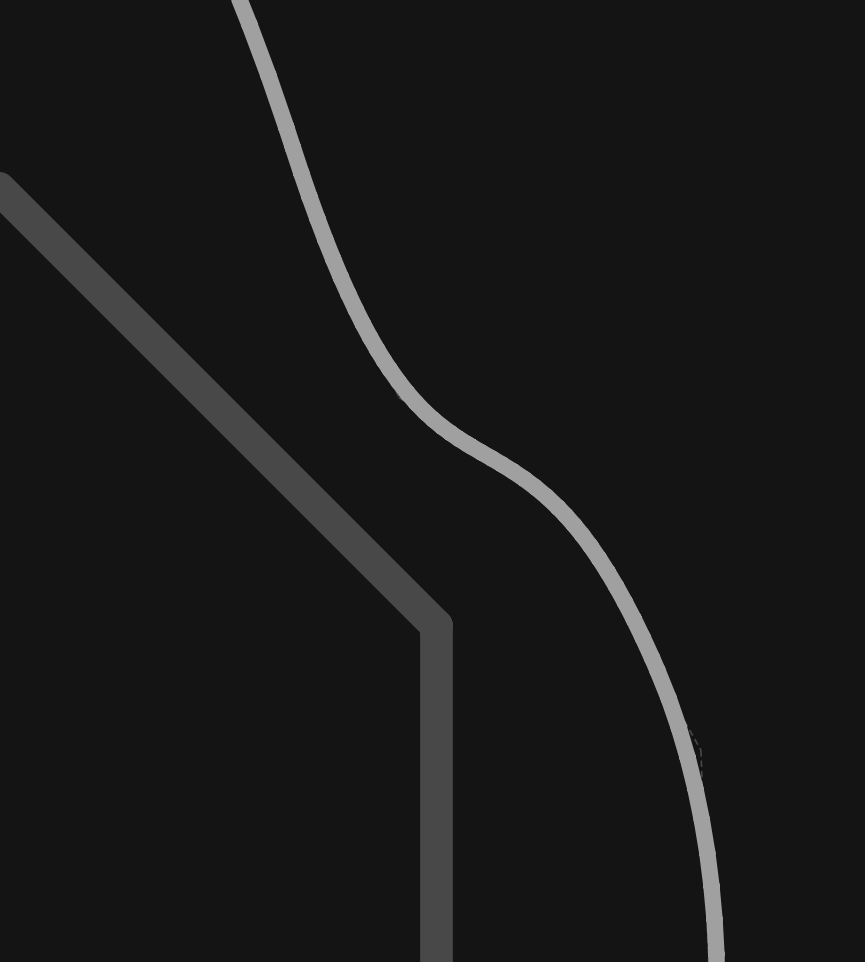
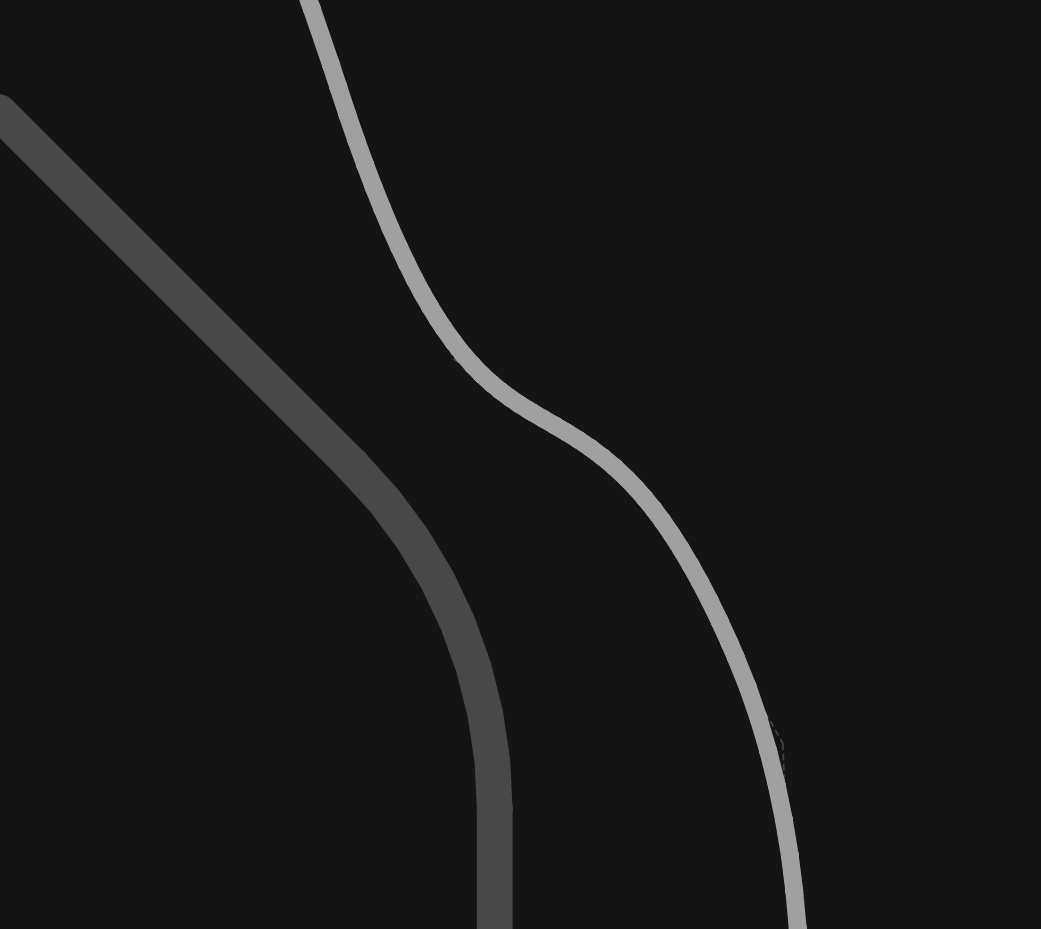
track: (305, 495) (436, 625) (436, 810) -> (352, 465) (384, 500) (412, 539) (437, 580) (457, 623) (473, 668) (485, 714) (492, 761) (494, 808)

